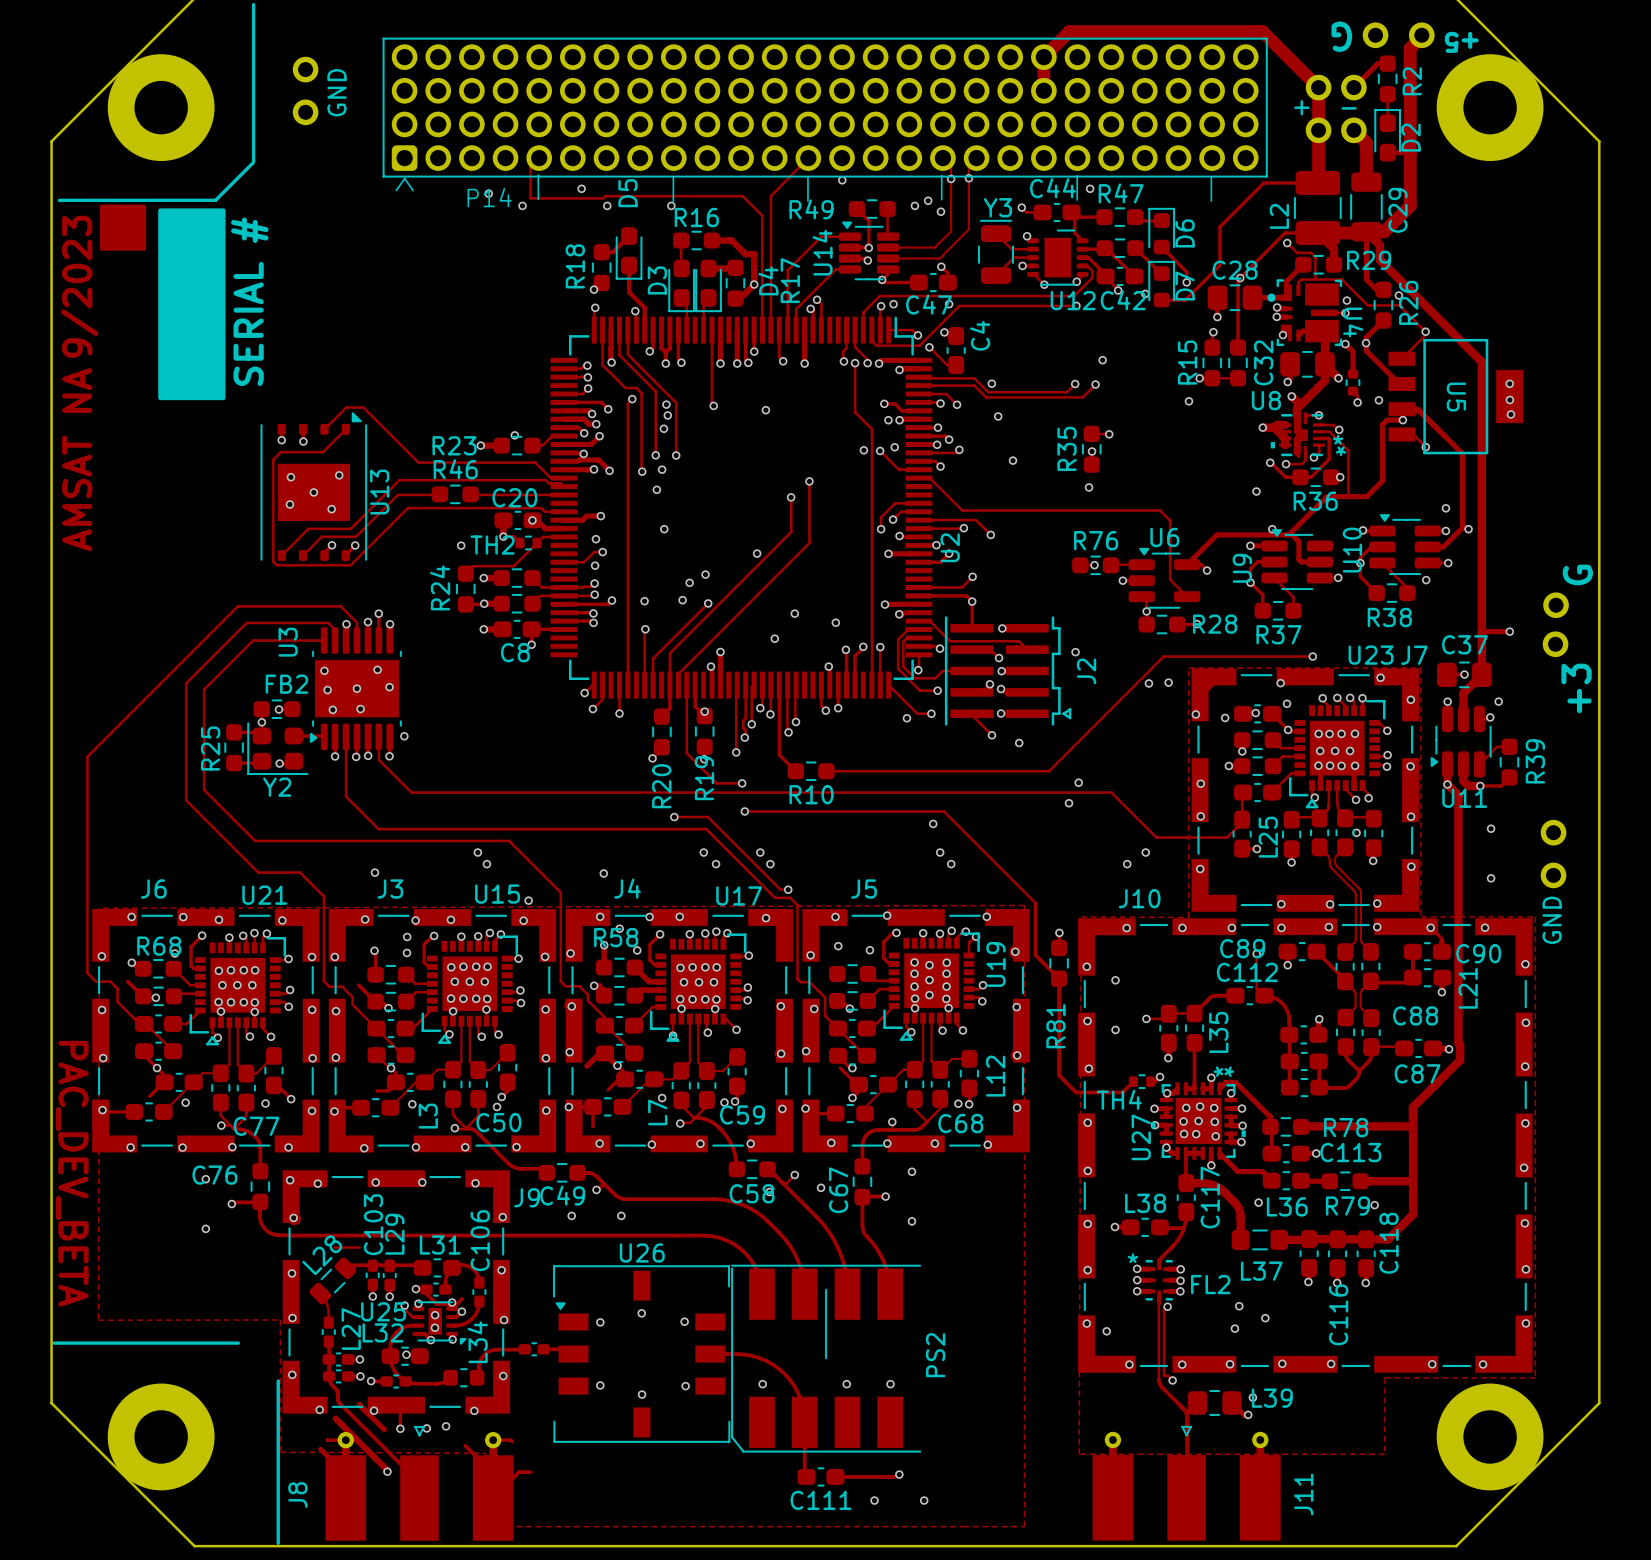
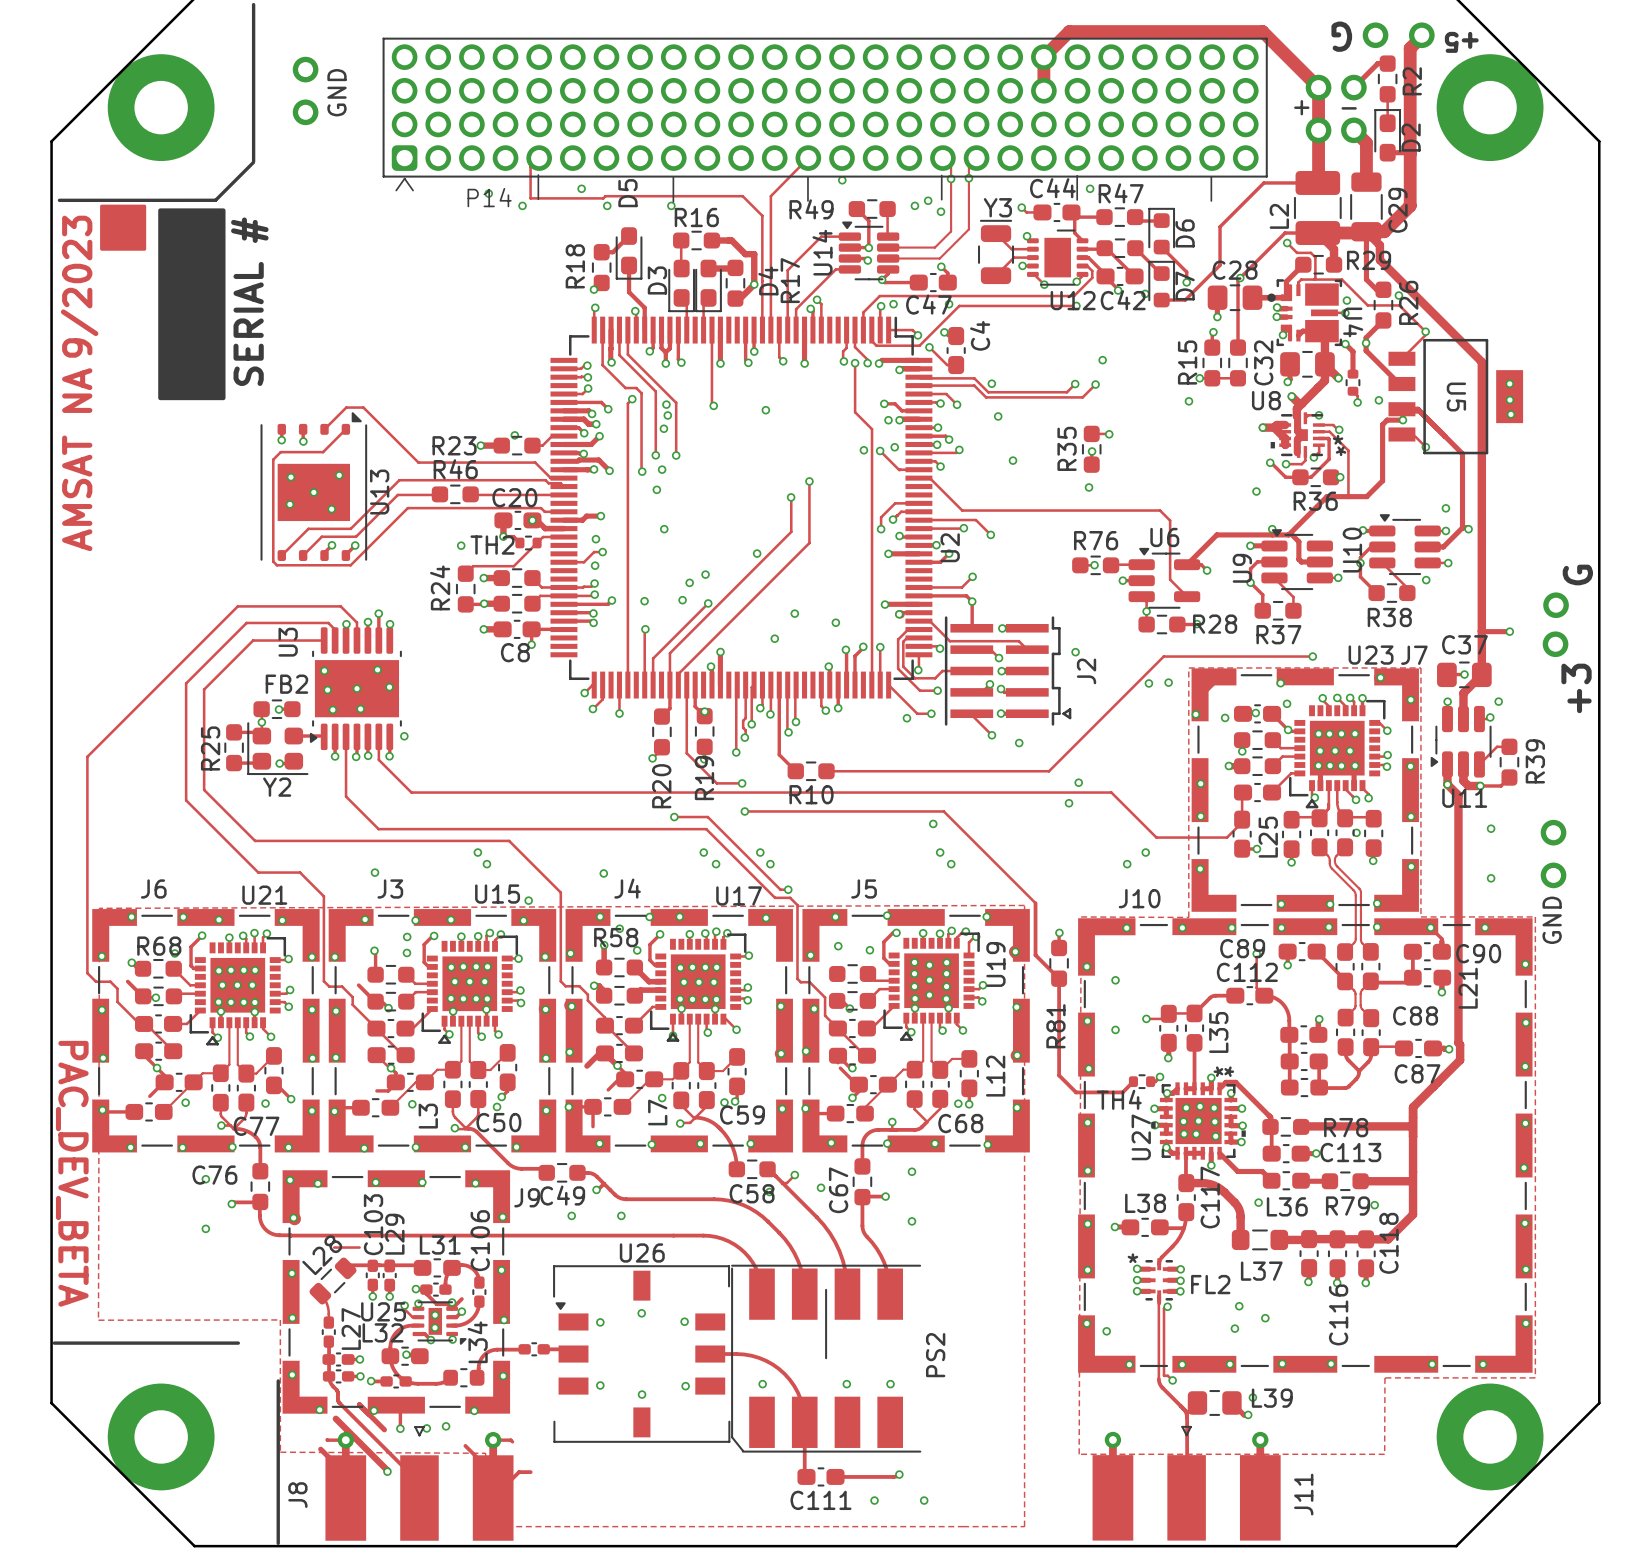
track: (737, 330) (737, 363) -> none
via: (737, 363) -> none

